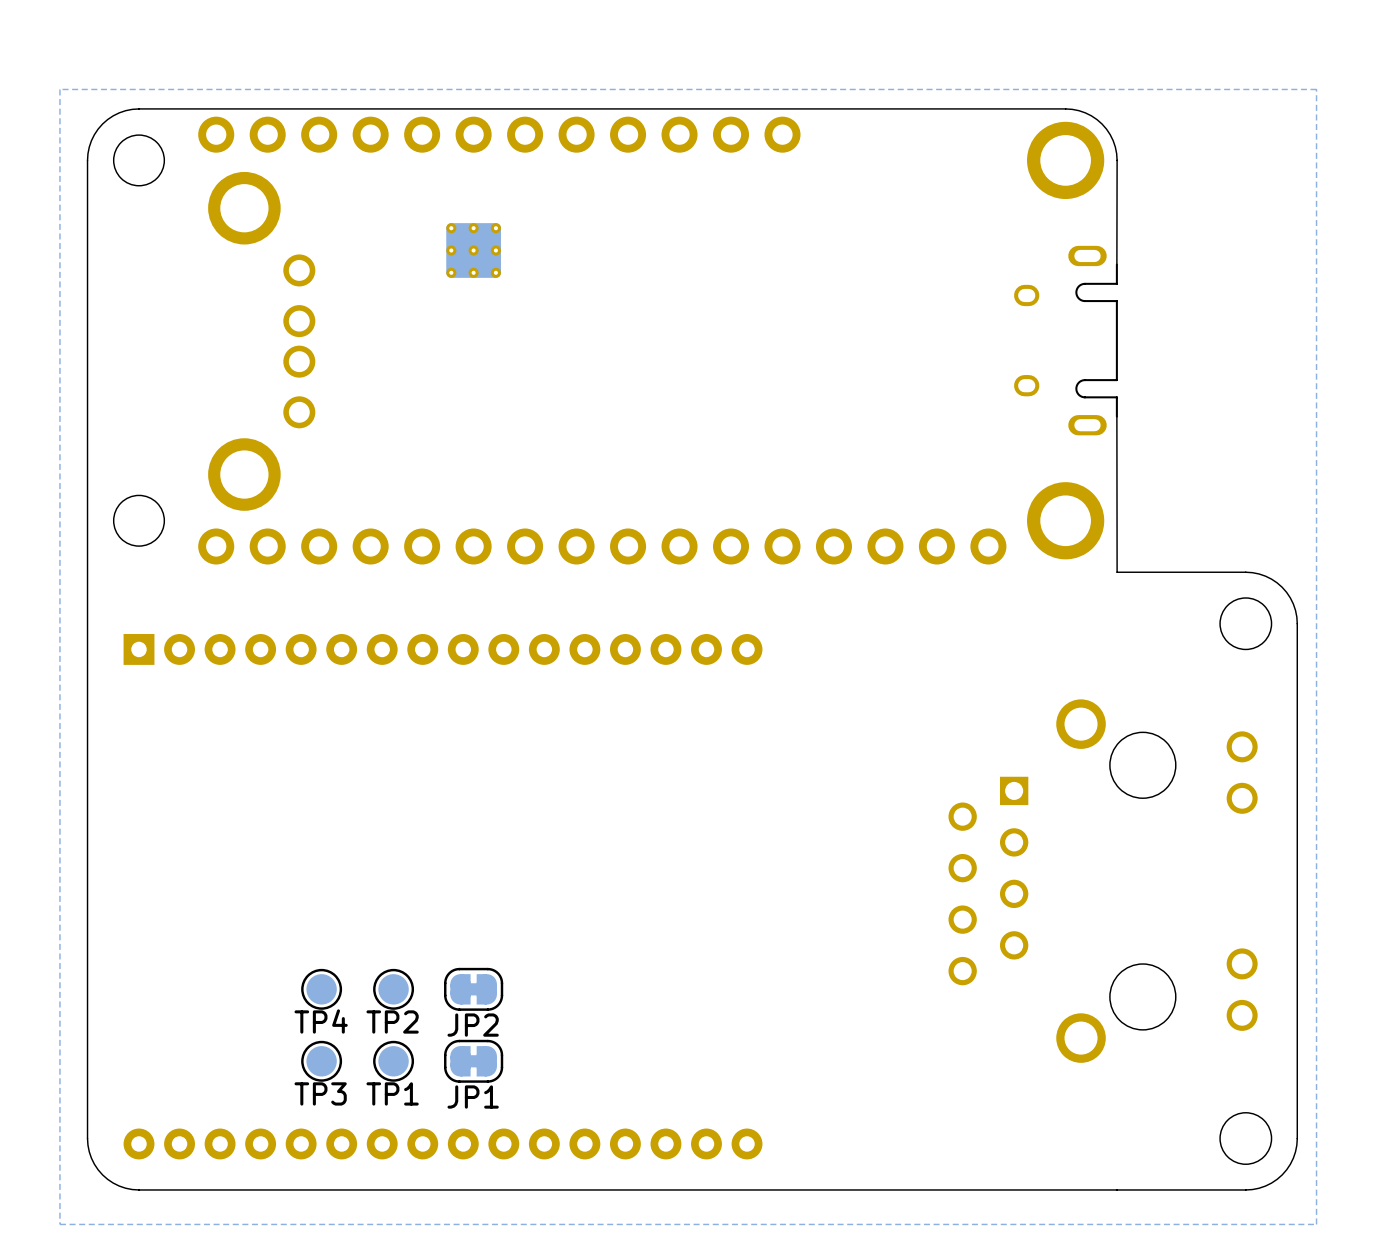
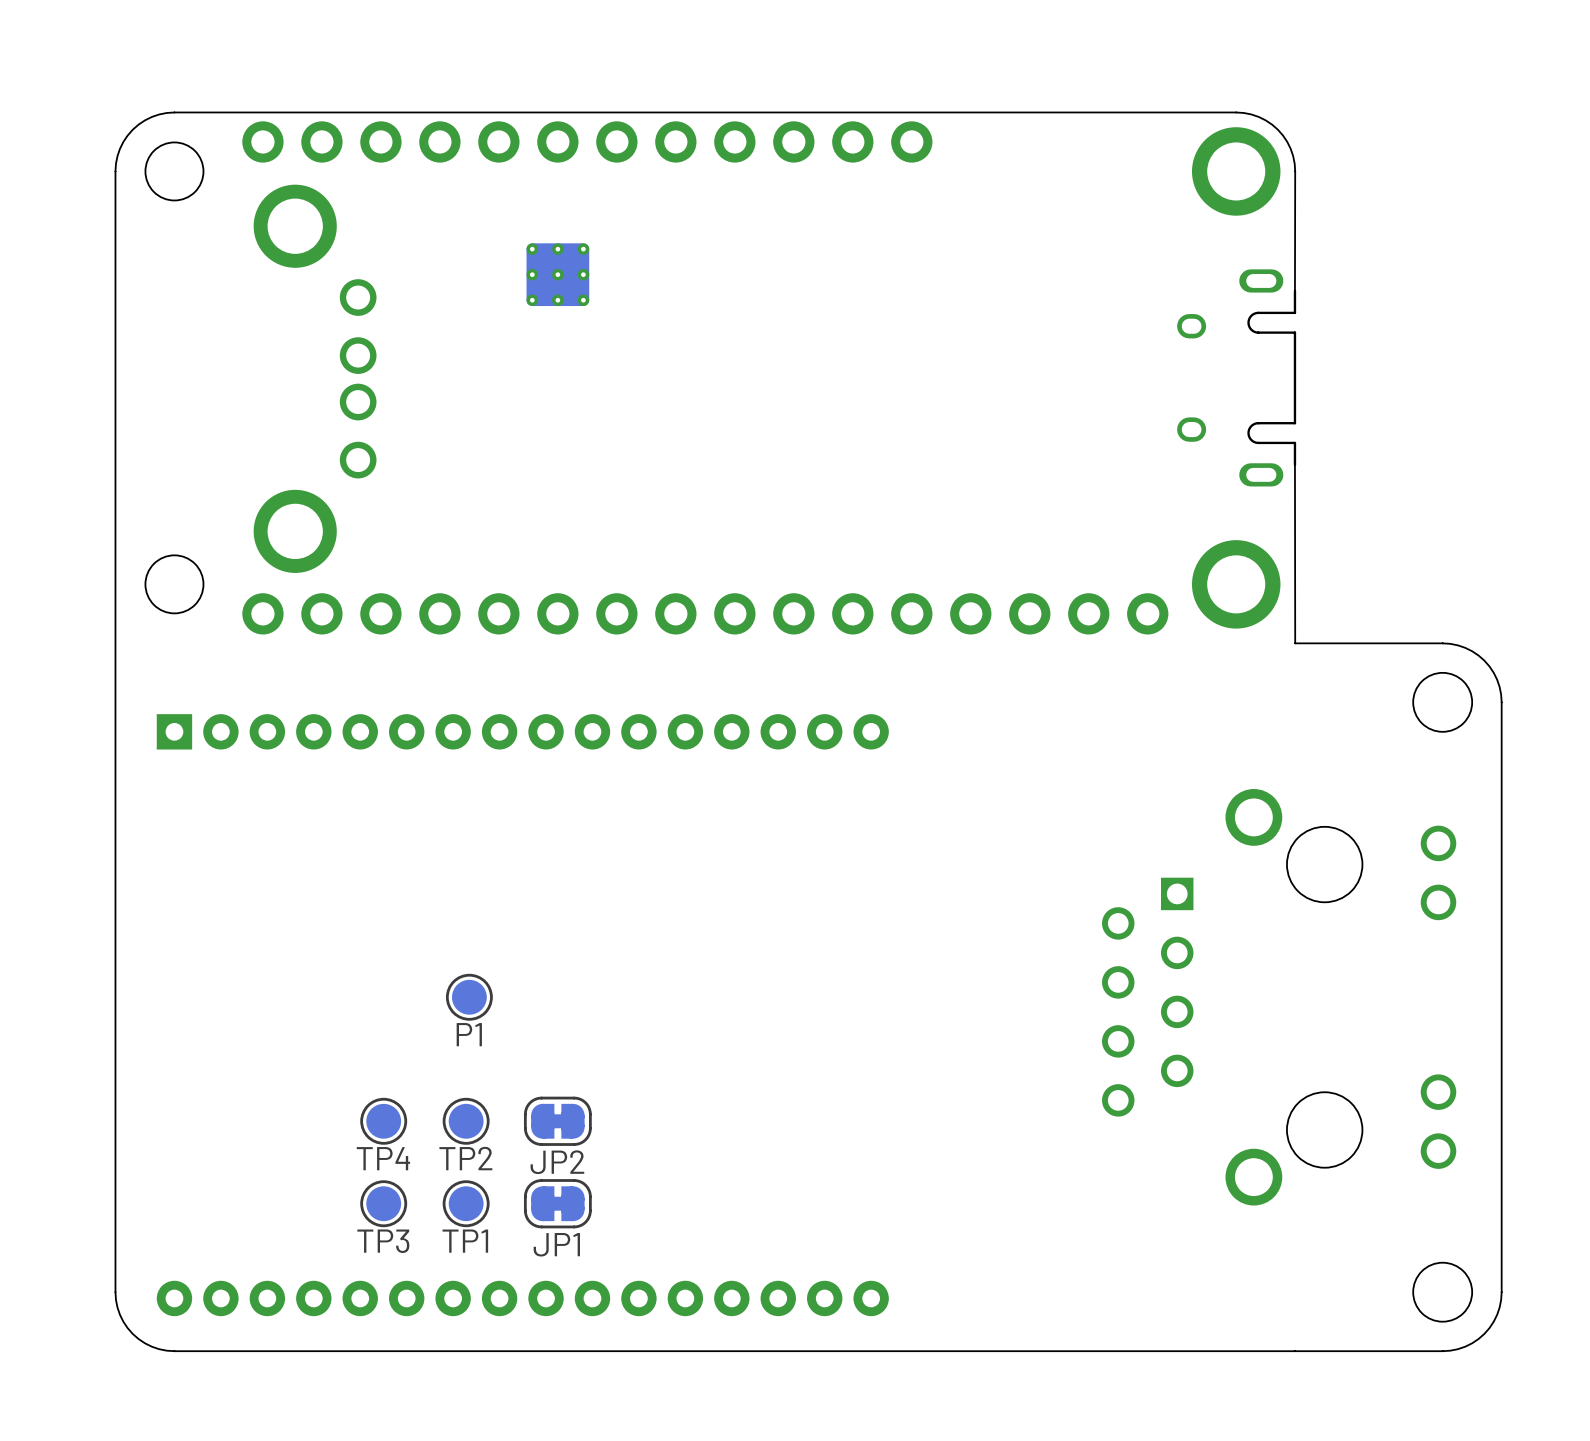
zone outline: (1316, 89) (1316, 1224) (59, 1224) (59, 89) (1316, 89) -> none
P1: none -> (469, 997)

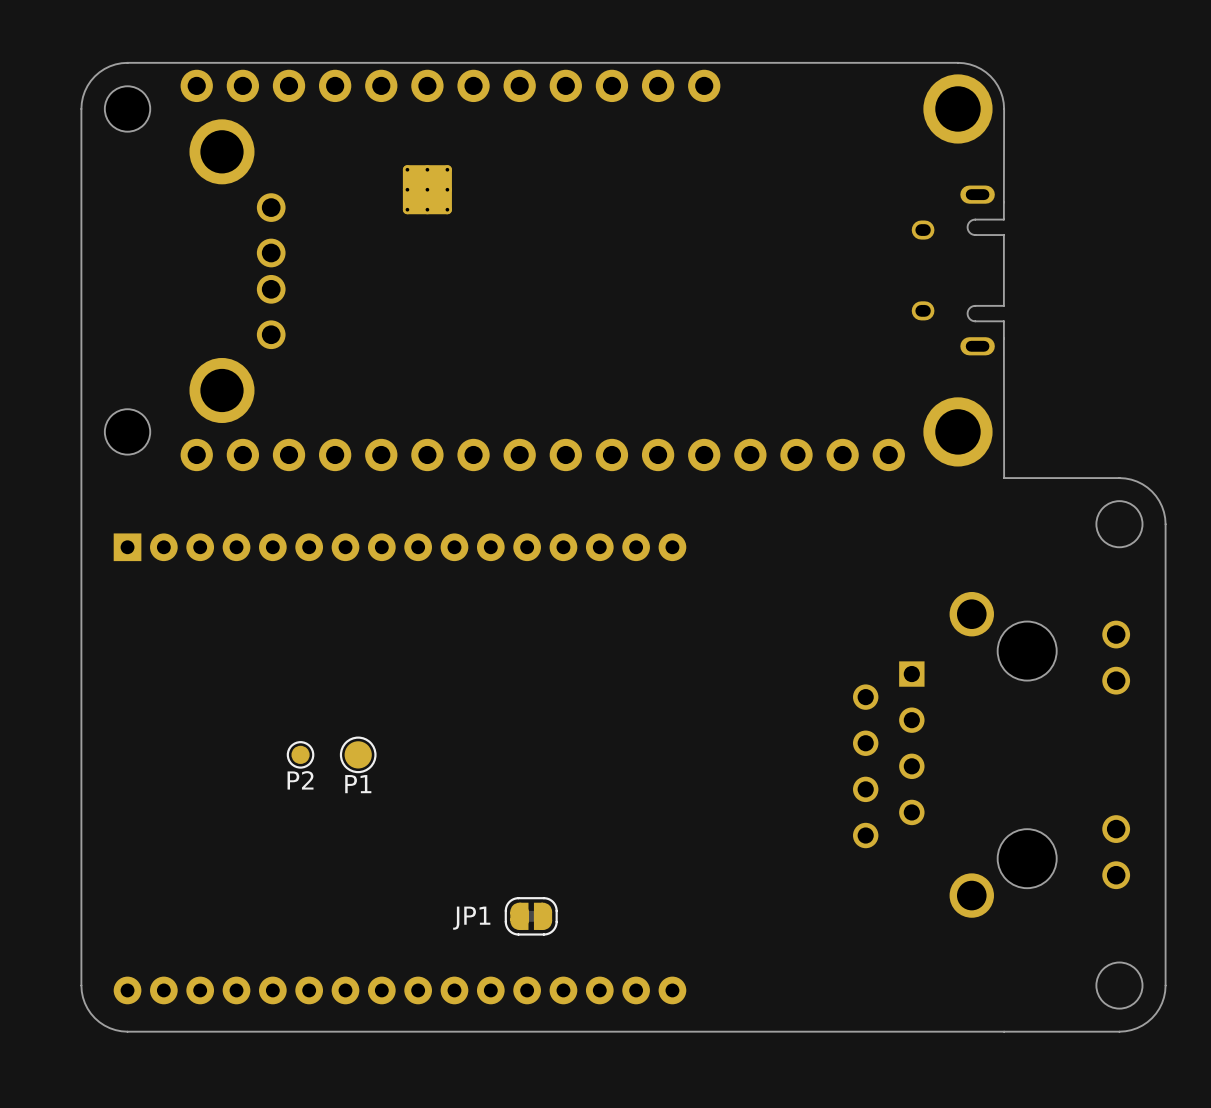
P2: none -> (300, 754)
TP4: (383, 1121) -> none
TP2: (466, 1121) -> none
JP2: (557, 1121) -> none
TP3: (383, 1203) -> none
TP1: (466, 1203) -> none
JP1 position: (557, 1203) -> (531, 916)
JP1 name position: JP1 (556, 1244) -> JP1 (471, 918)

